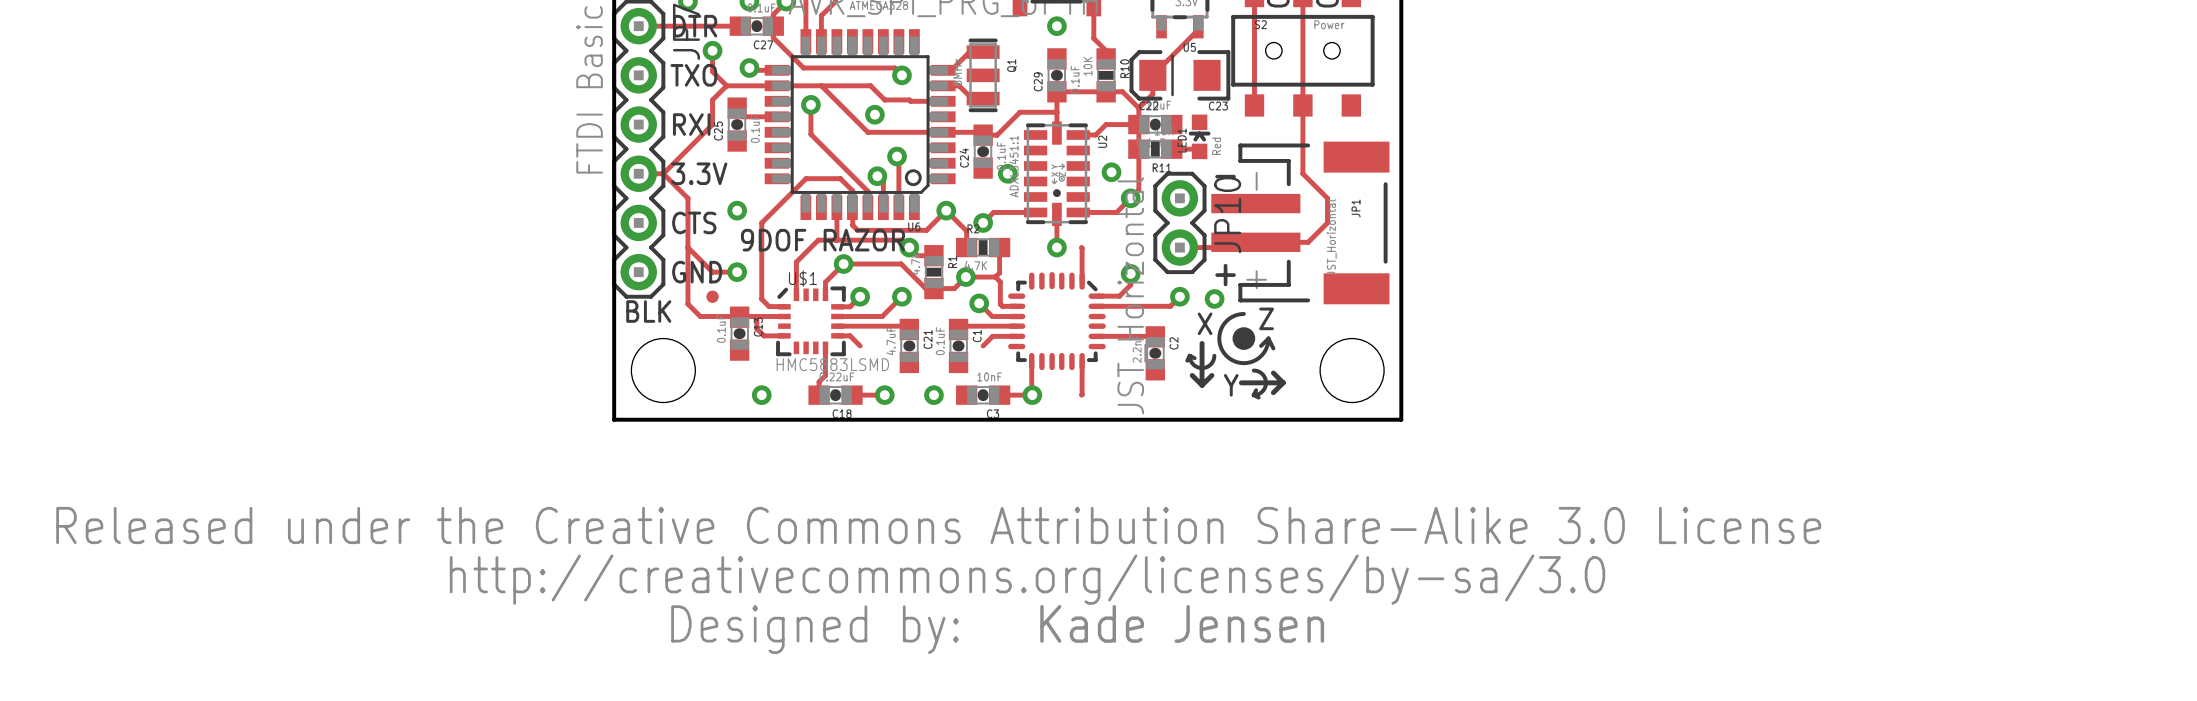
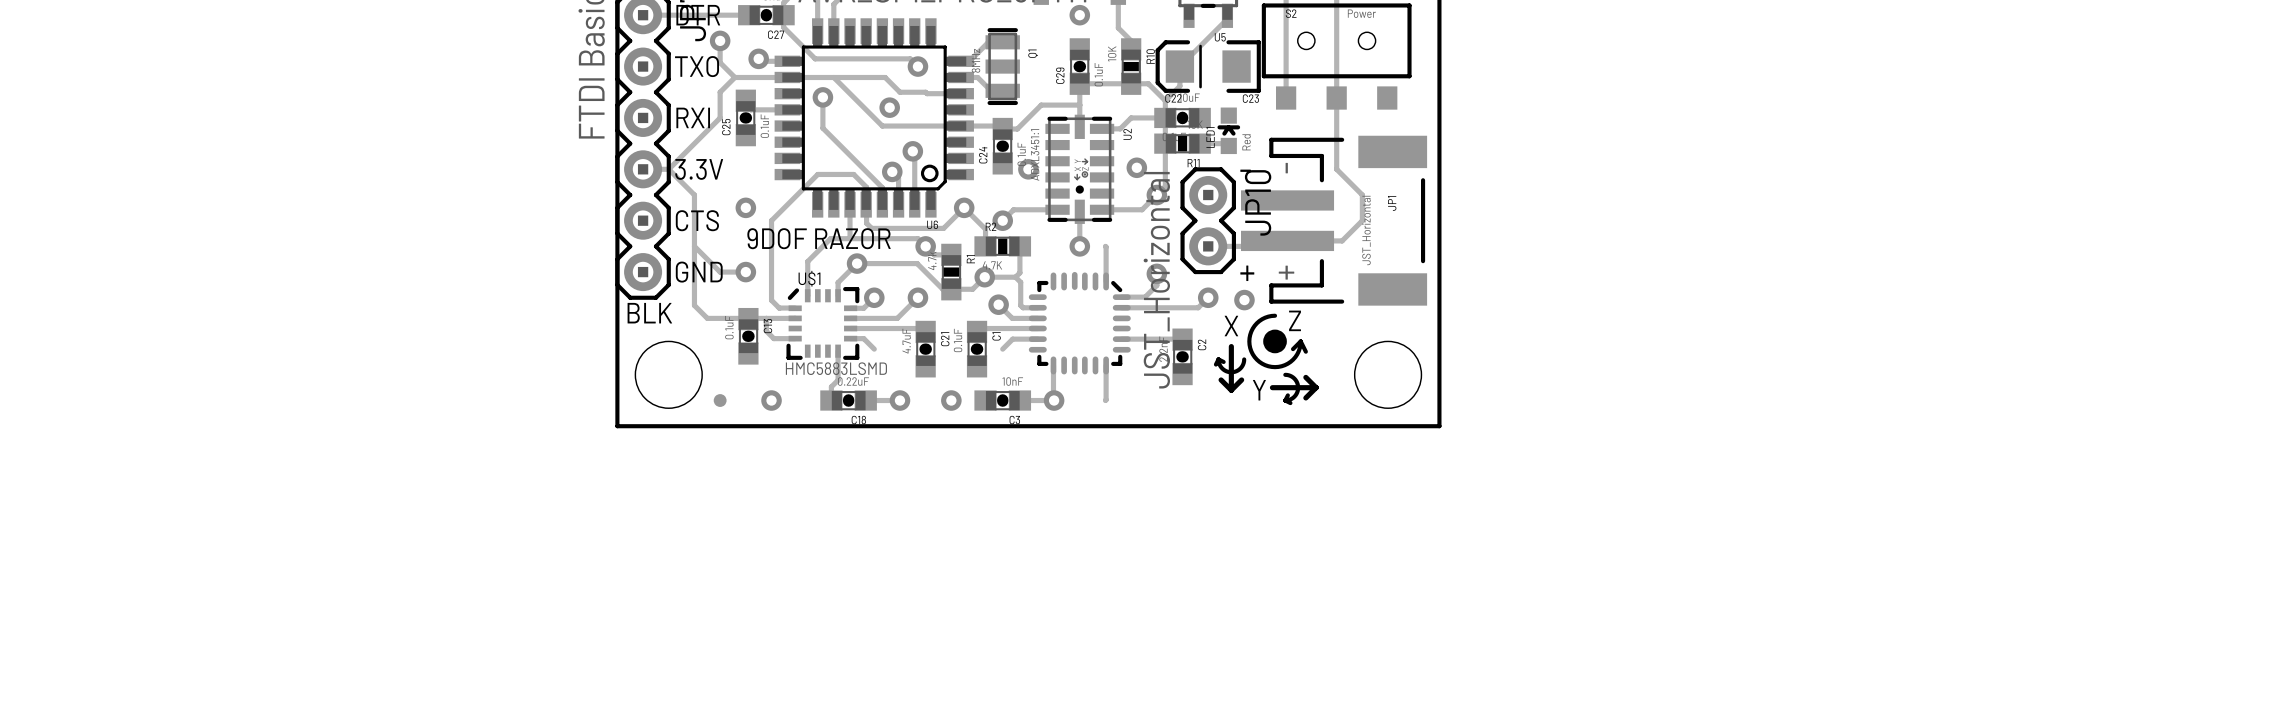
part position: (712, 296) -> (720, 400)
drawing: [56, 506, 1822, 654] -> none
text: Kade Jensen (1182, 623) -> none

